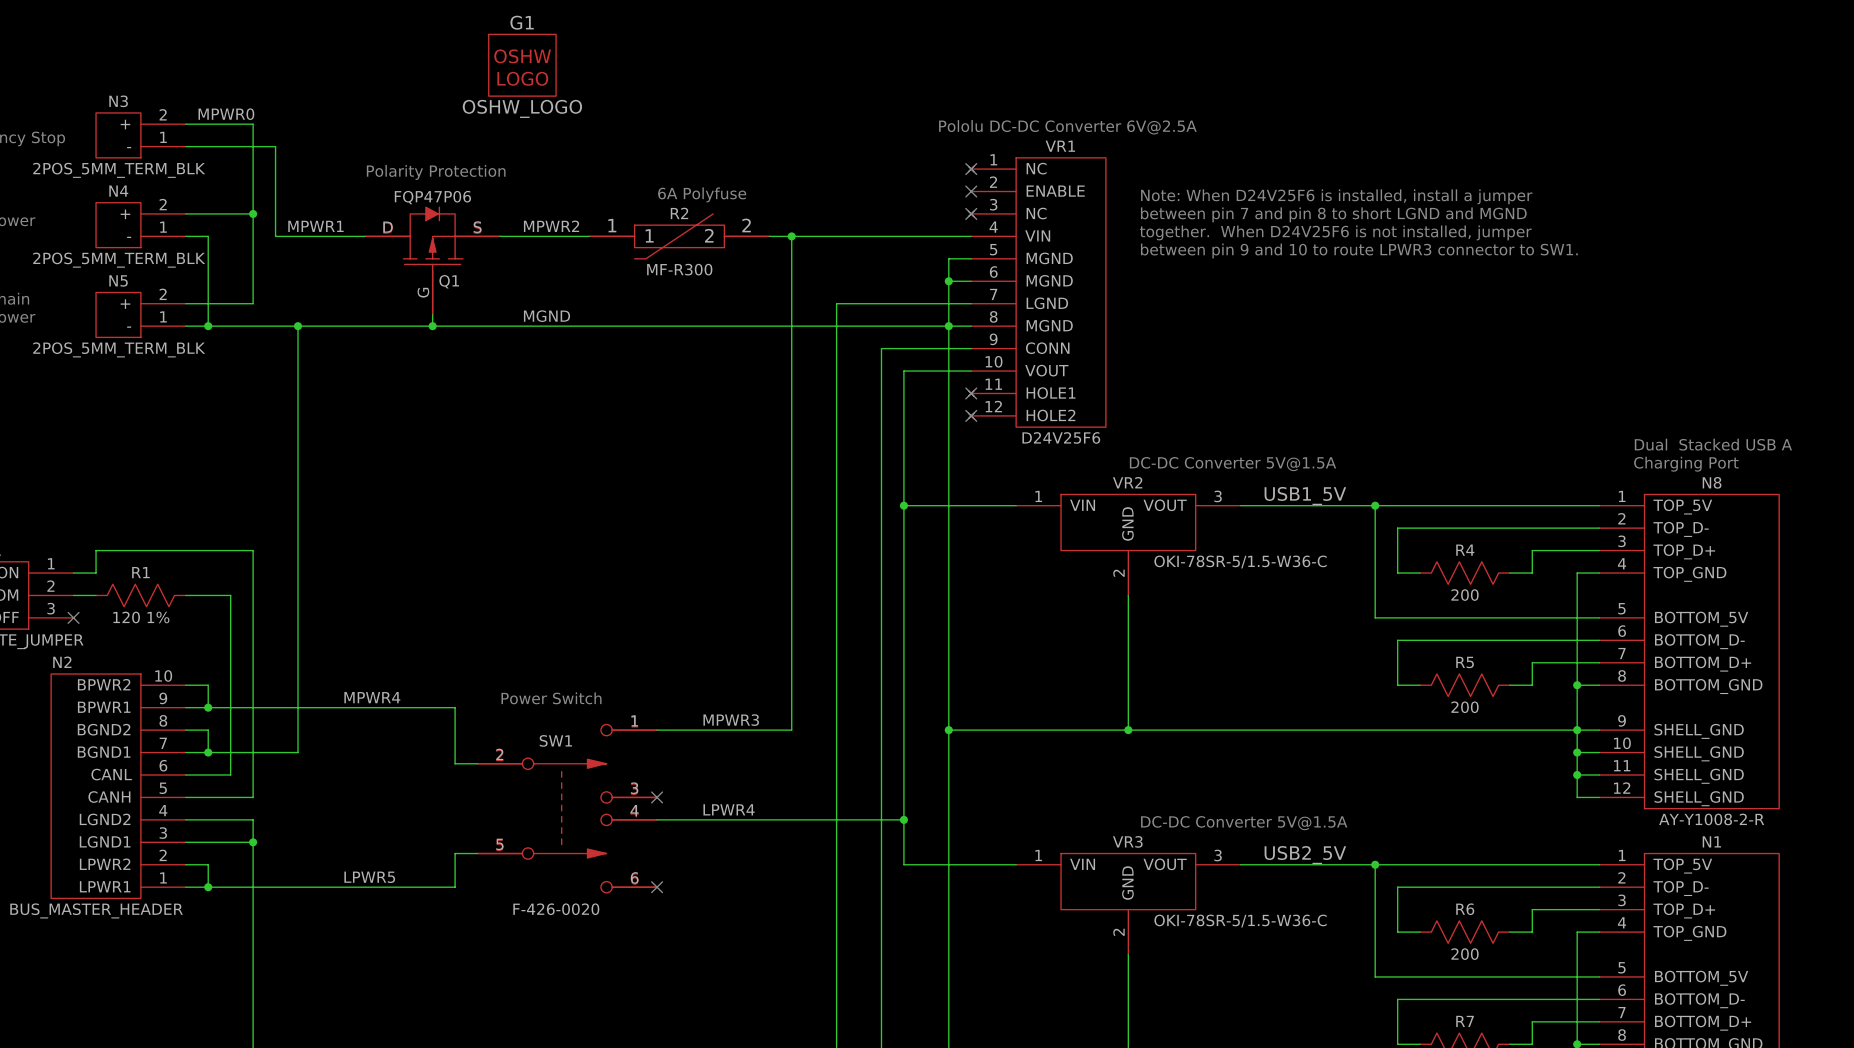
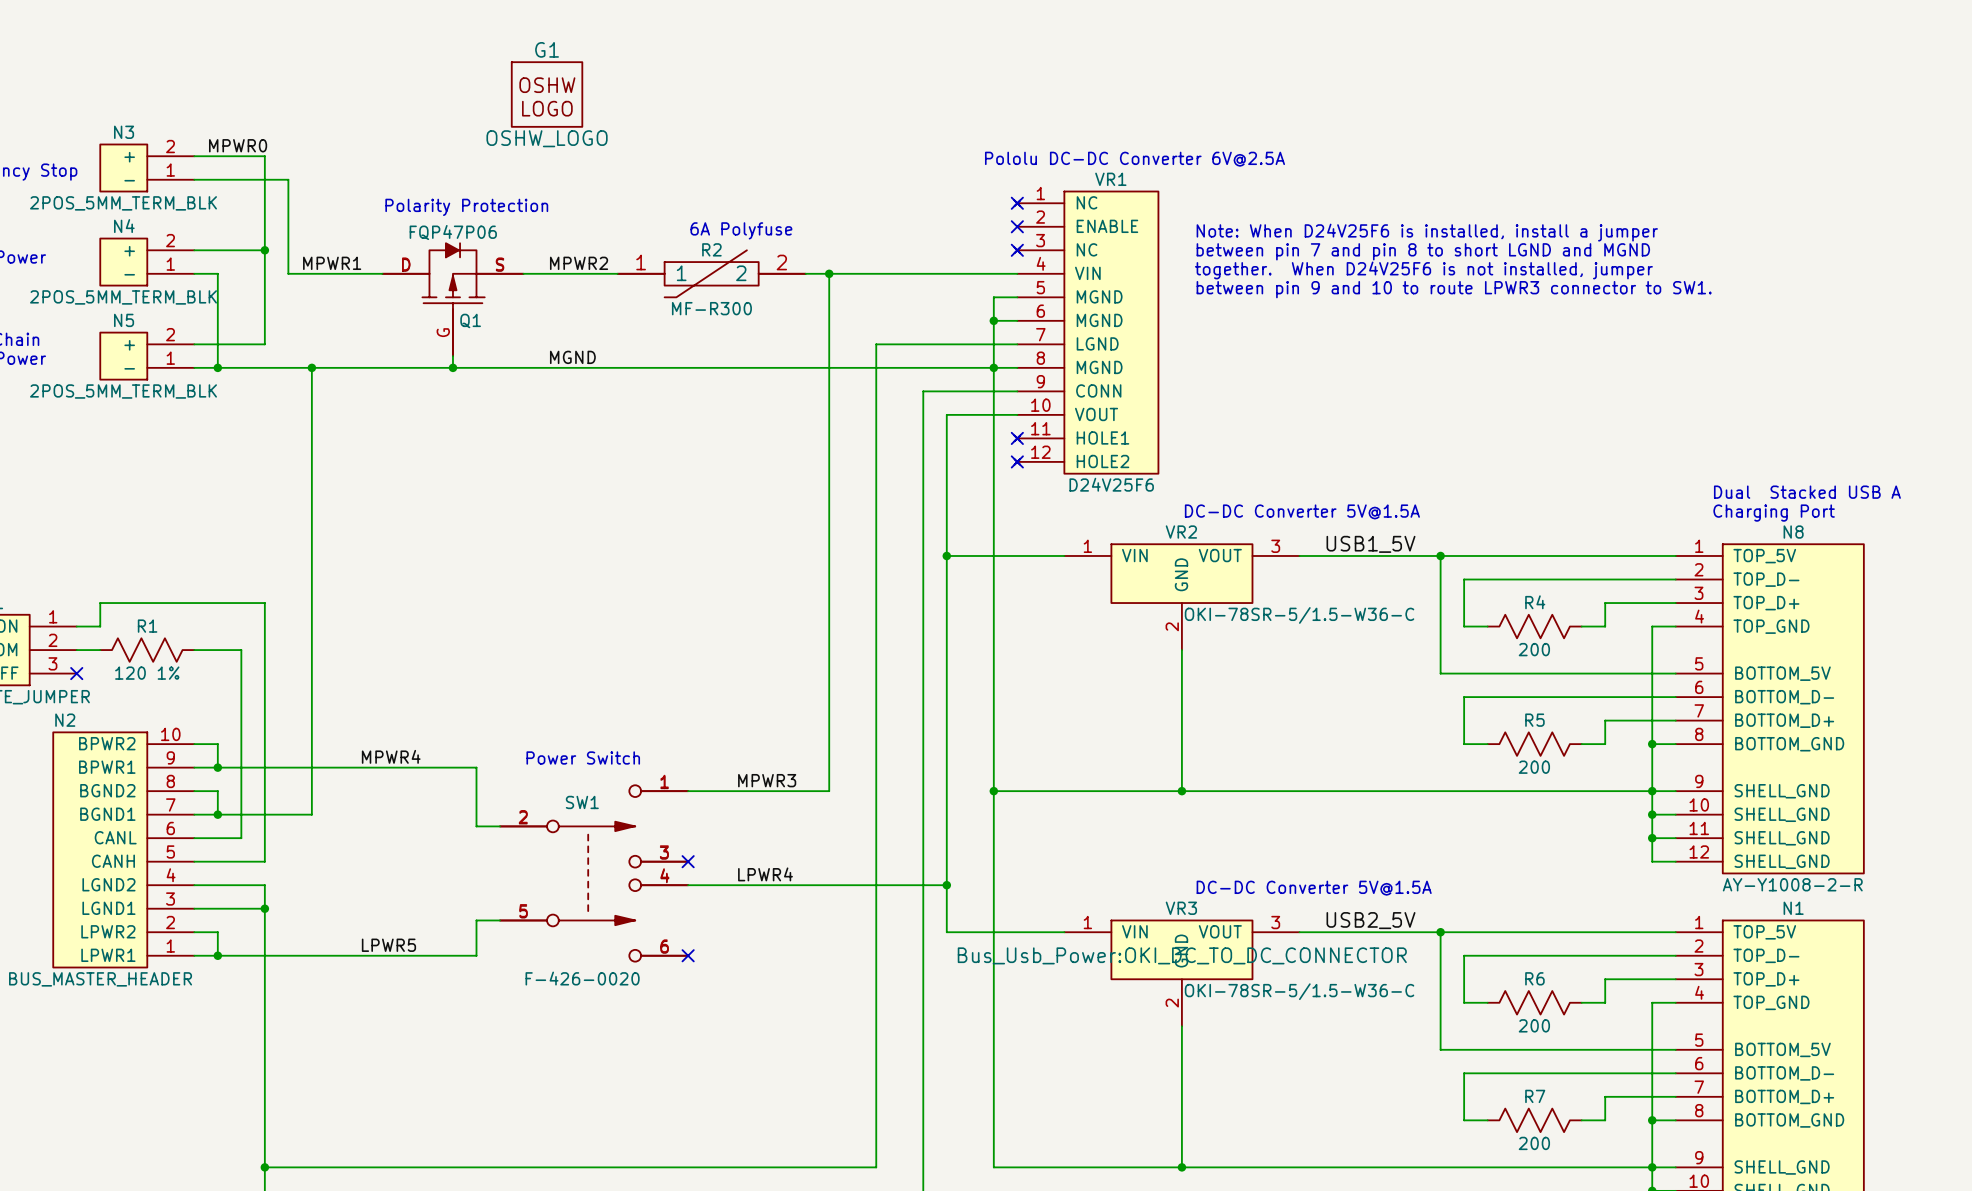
VR3 text: none -> Bus_Usb_Power:OKI_DC_TO_DC_CONNECTOR (1182, 955)

